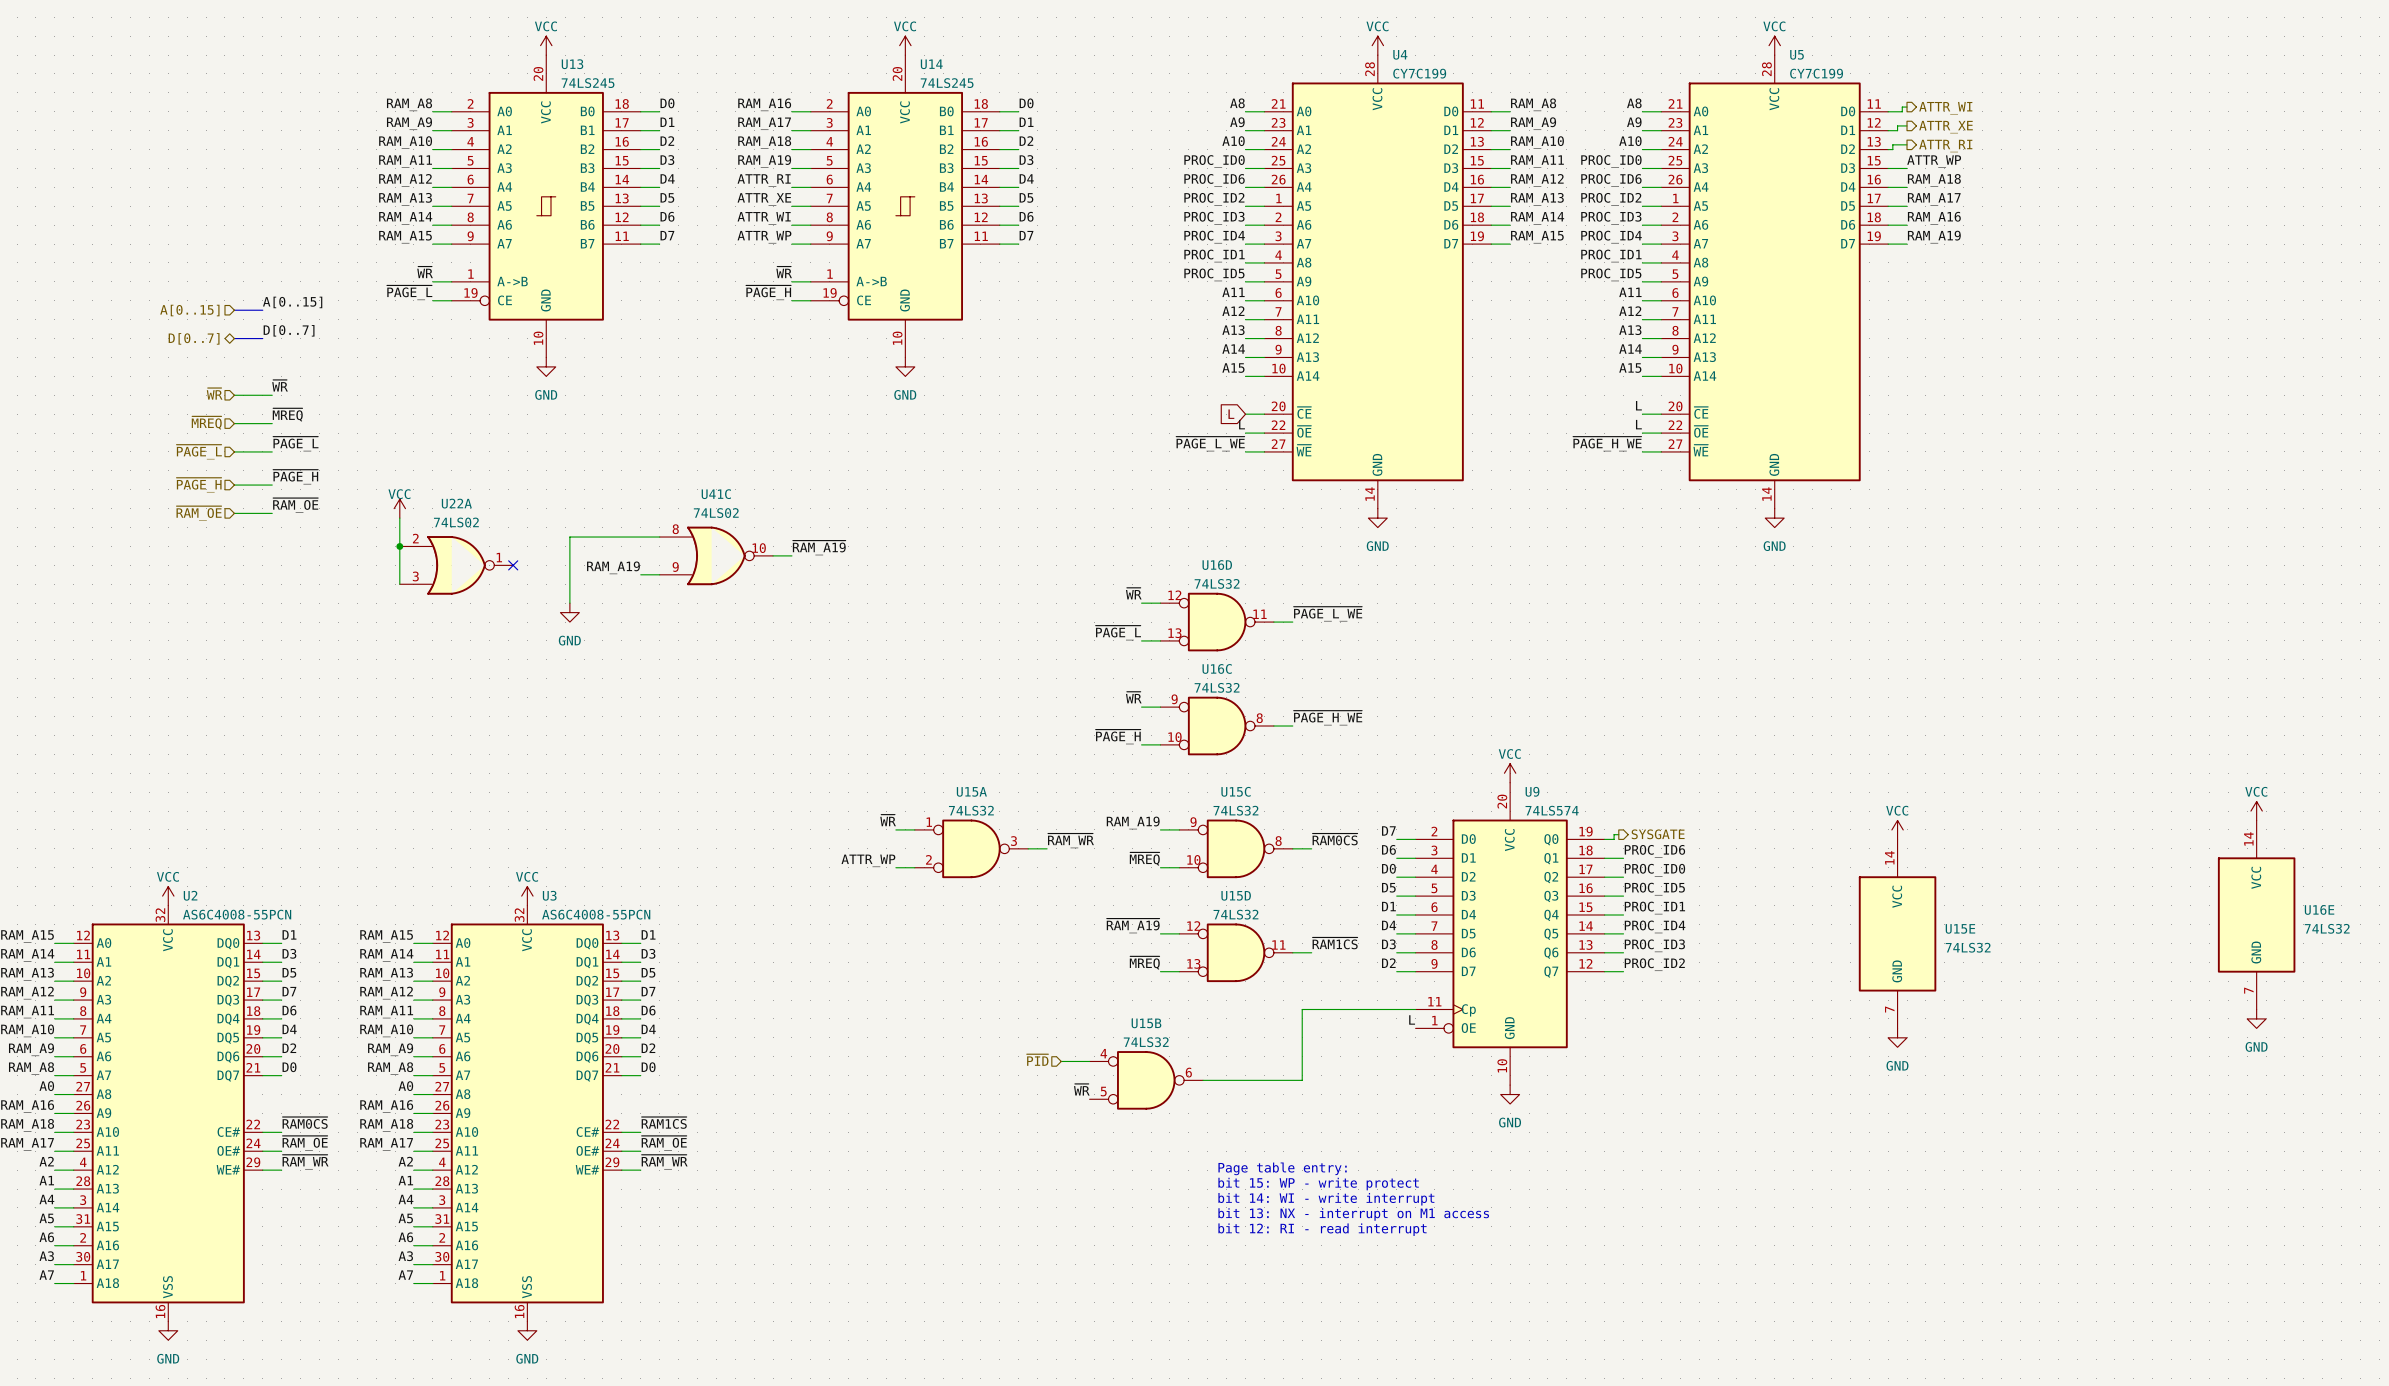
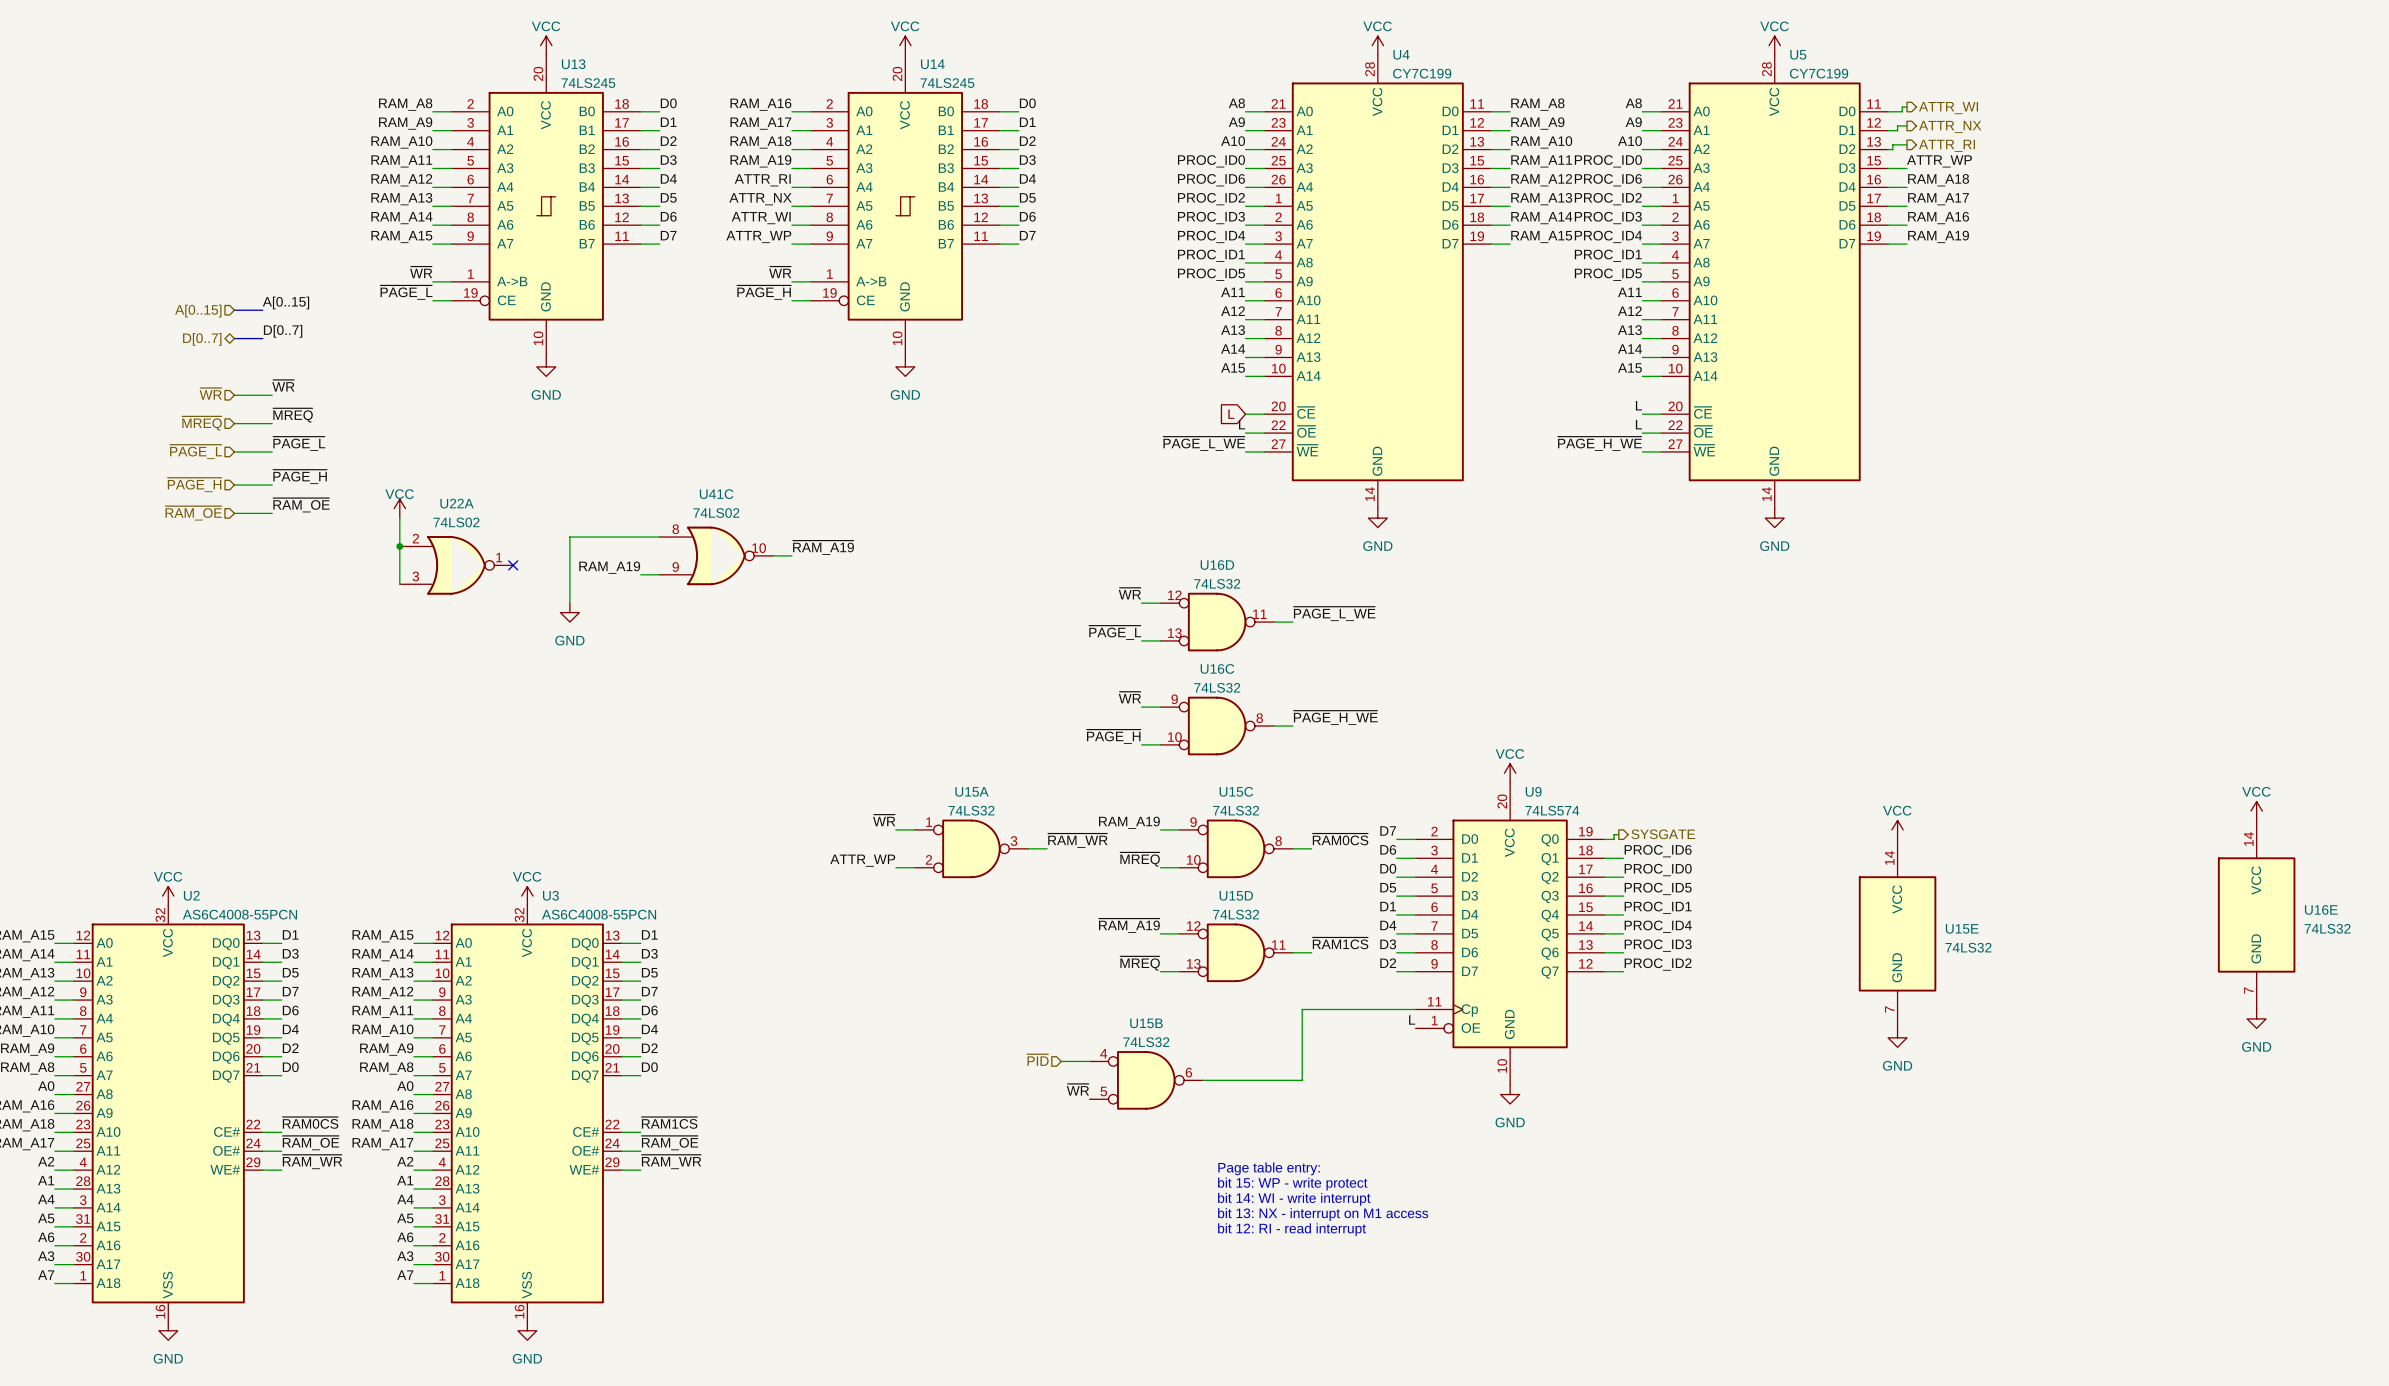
hierarchical label: ATTR_XE (1946, 127) -> ATTR_NX (1950, 126)
label: ATTR_XE (764, 199) -> ATTR_NX (760, 199)

